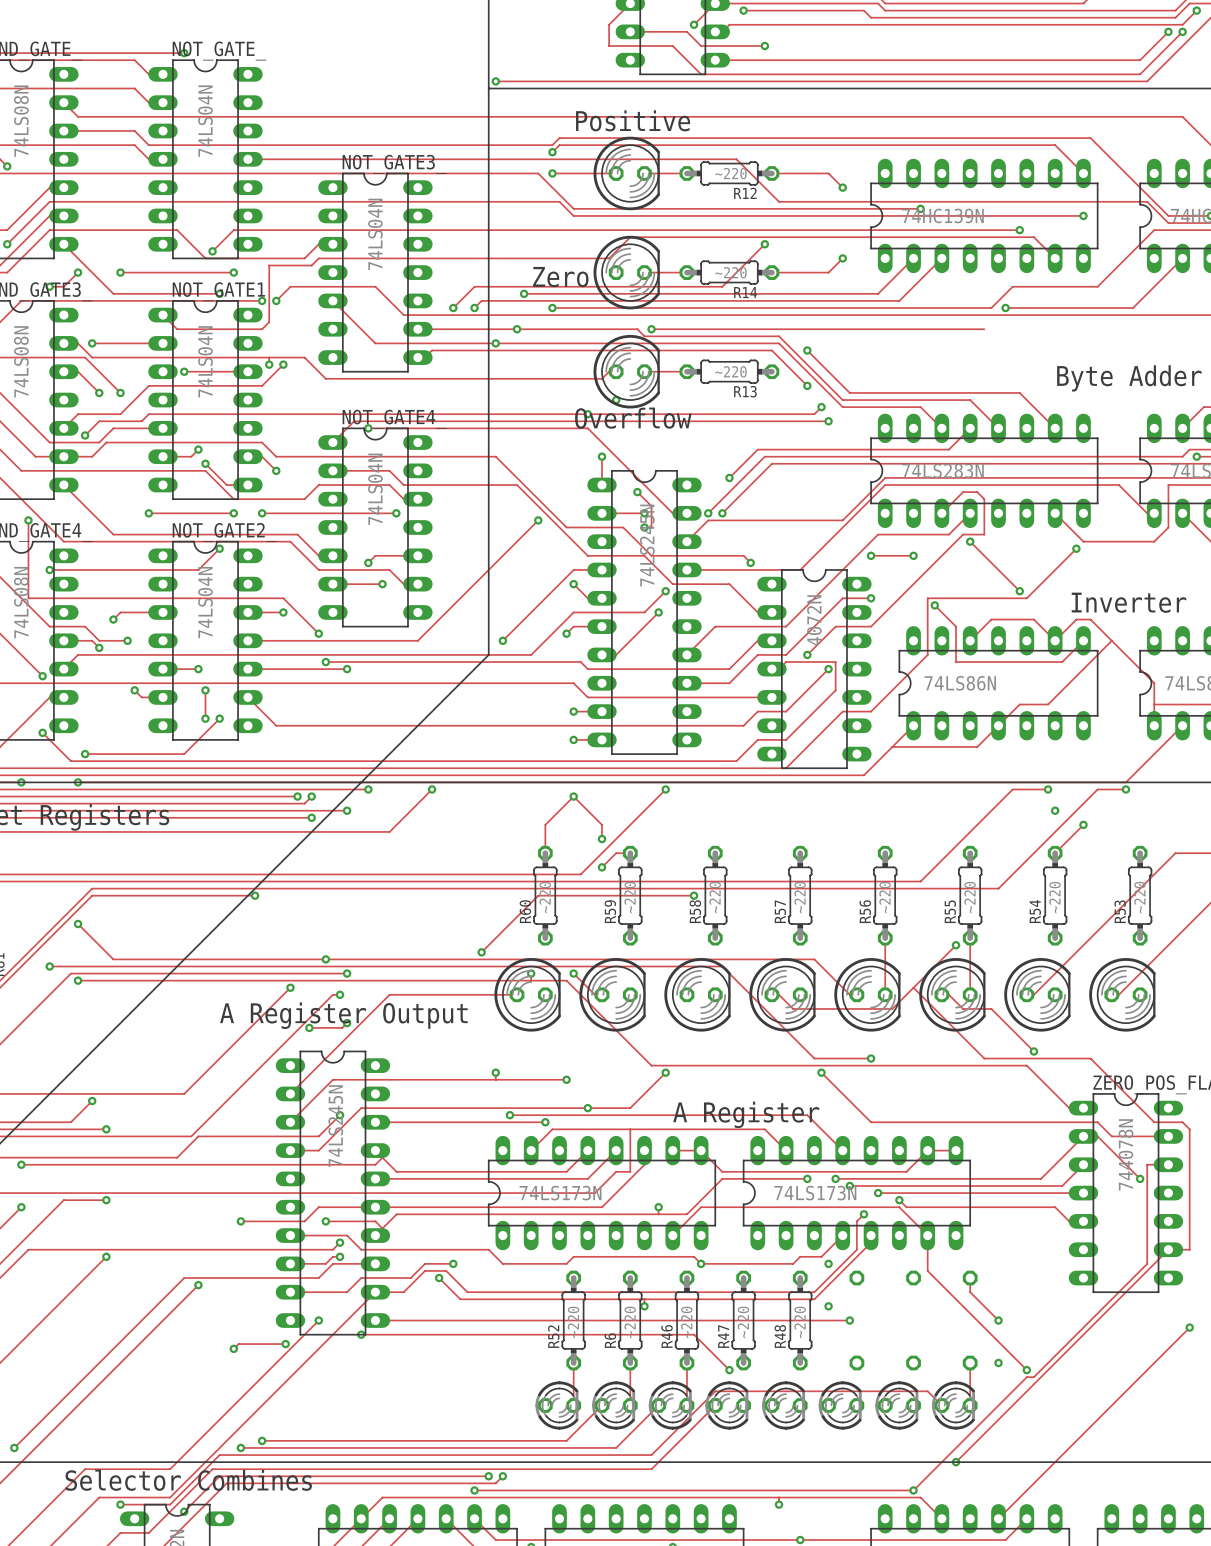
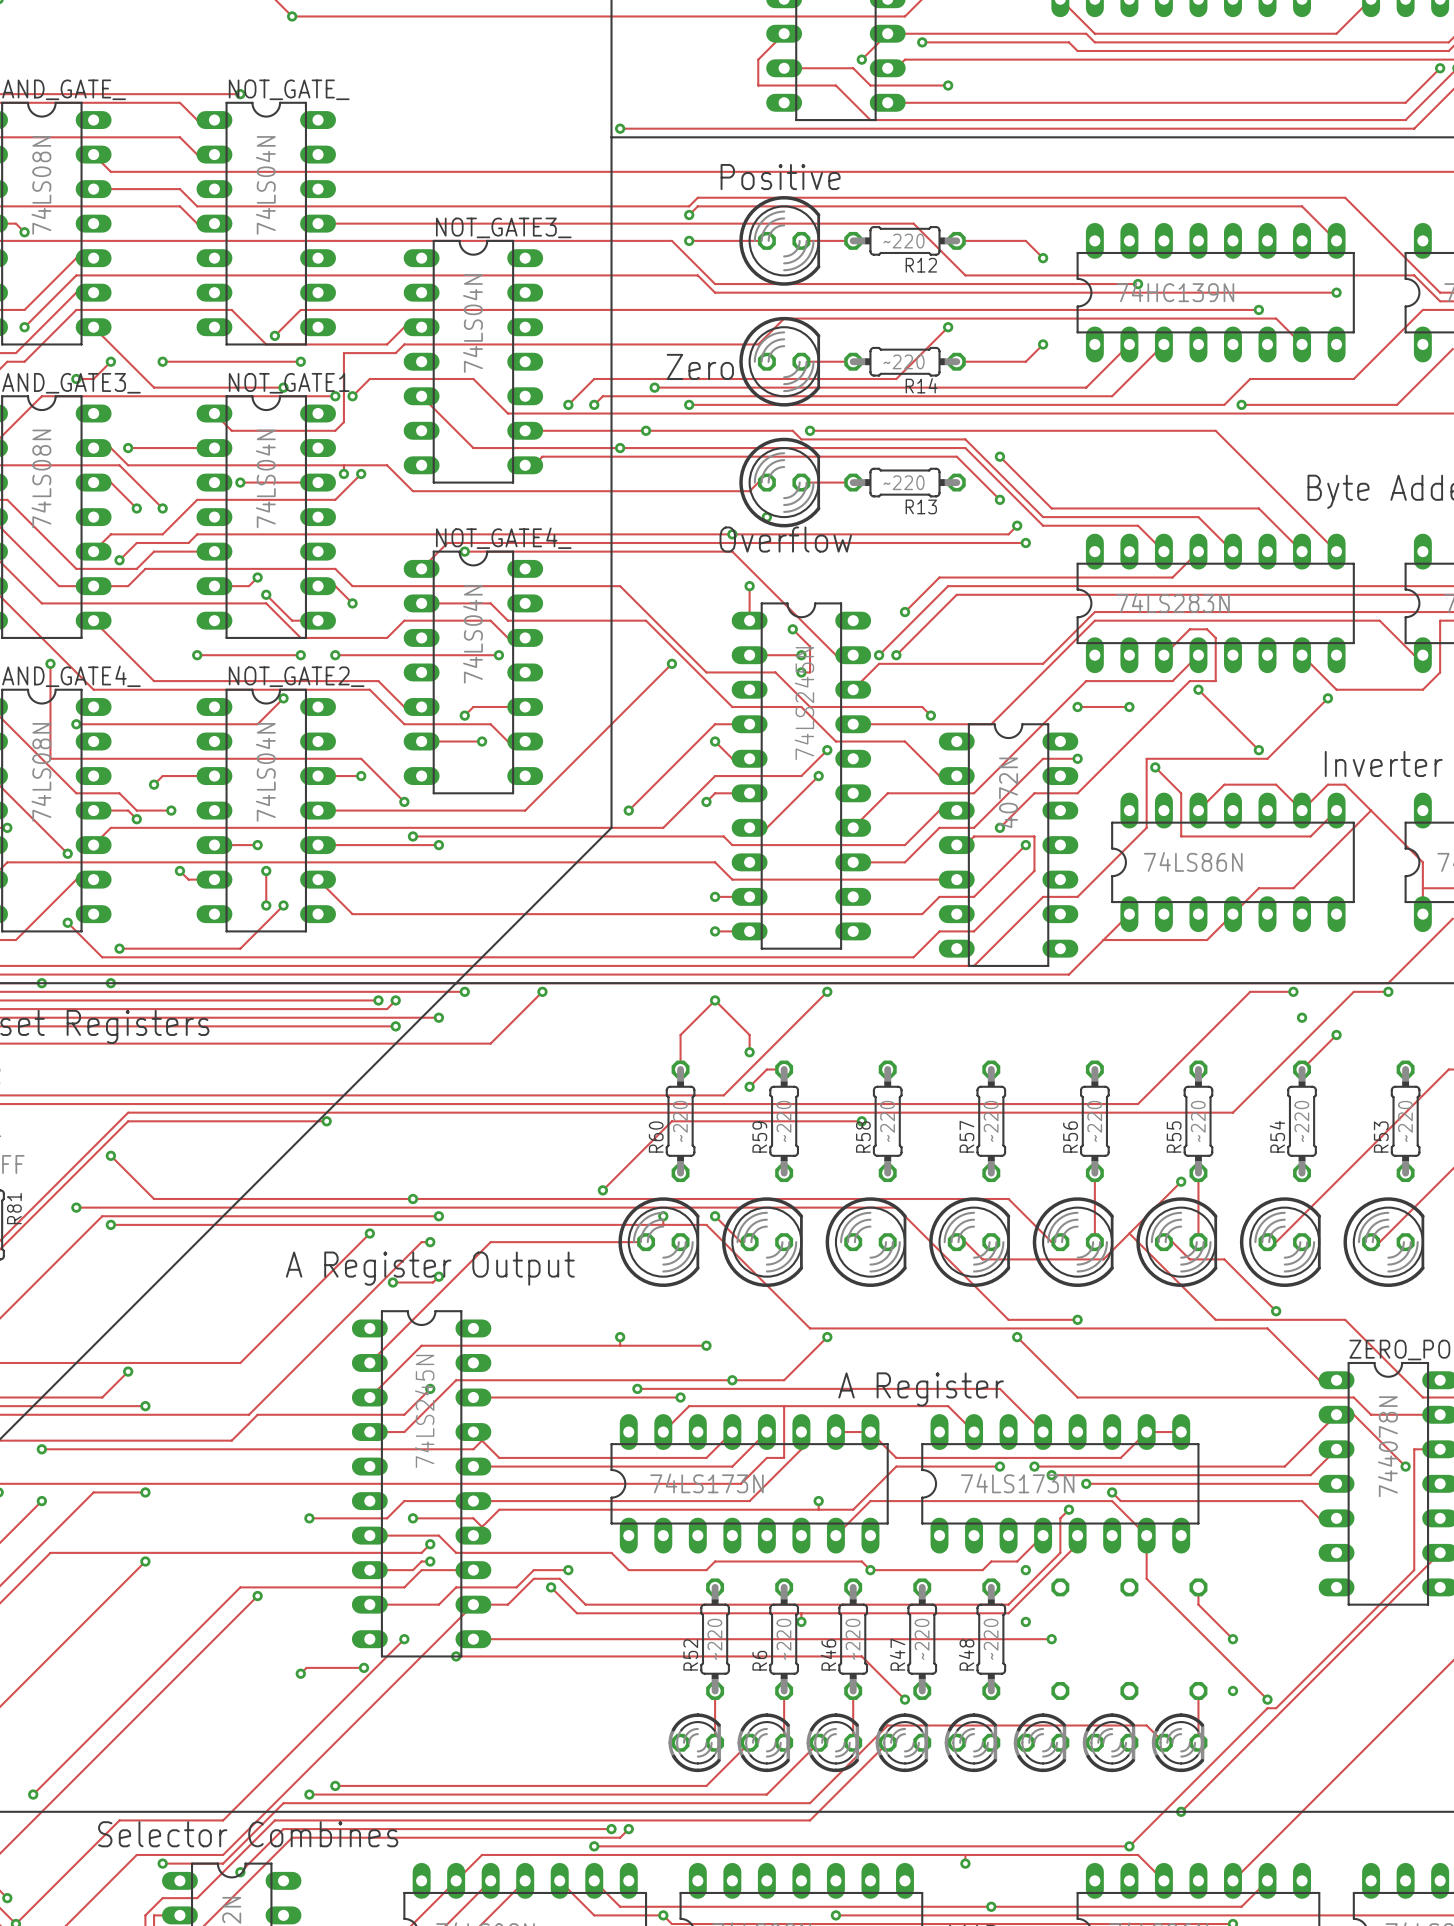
track: none -> (1215, 430) (1336, 551)

